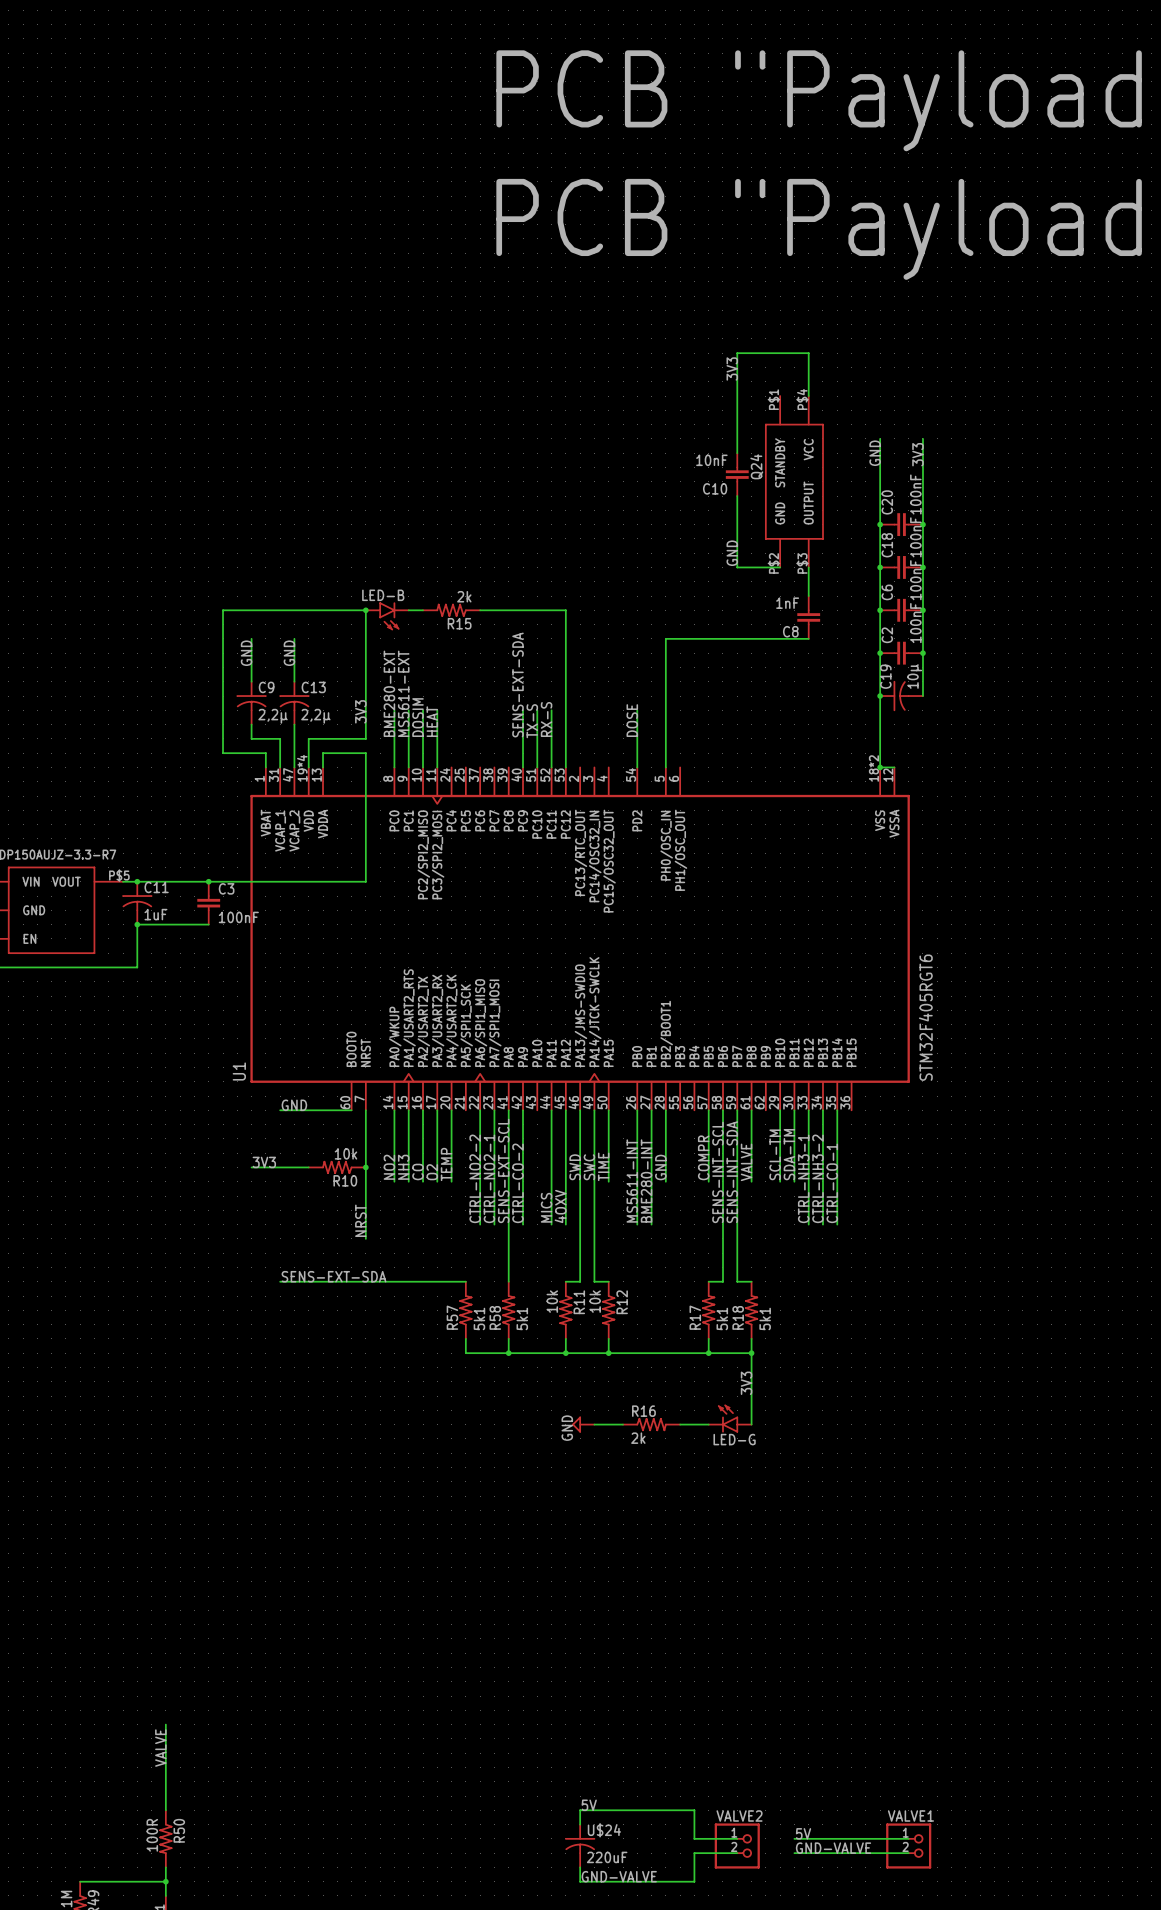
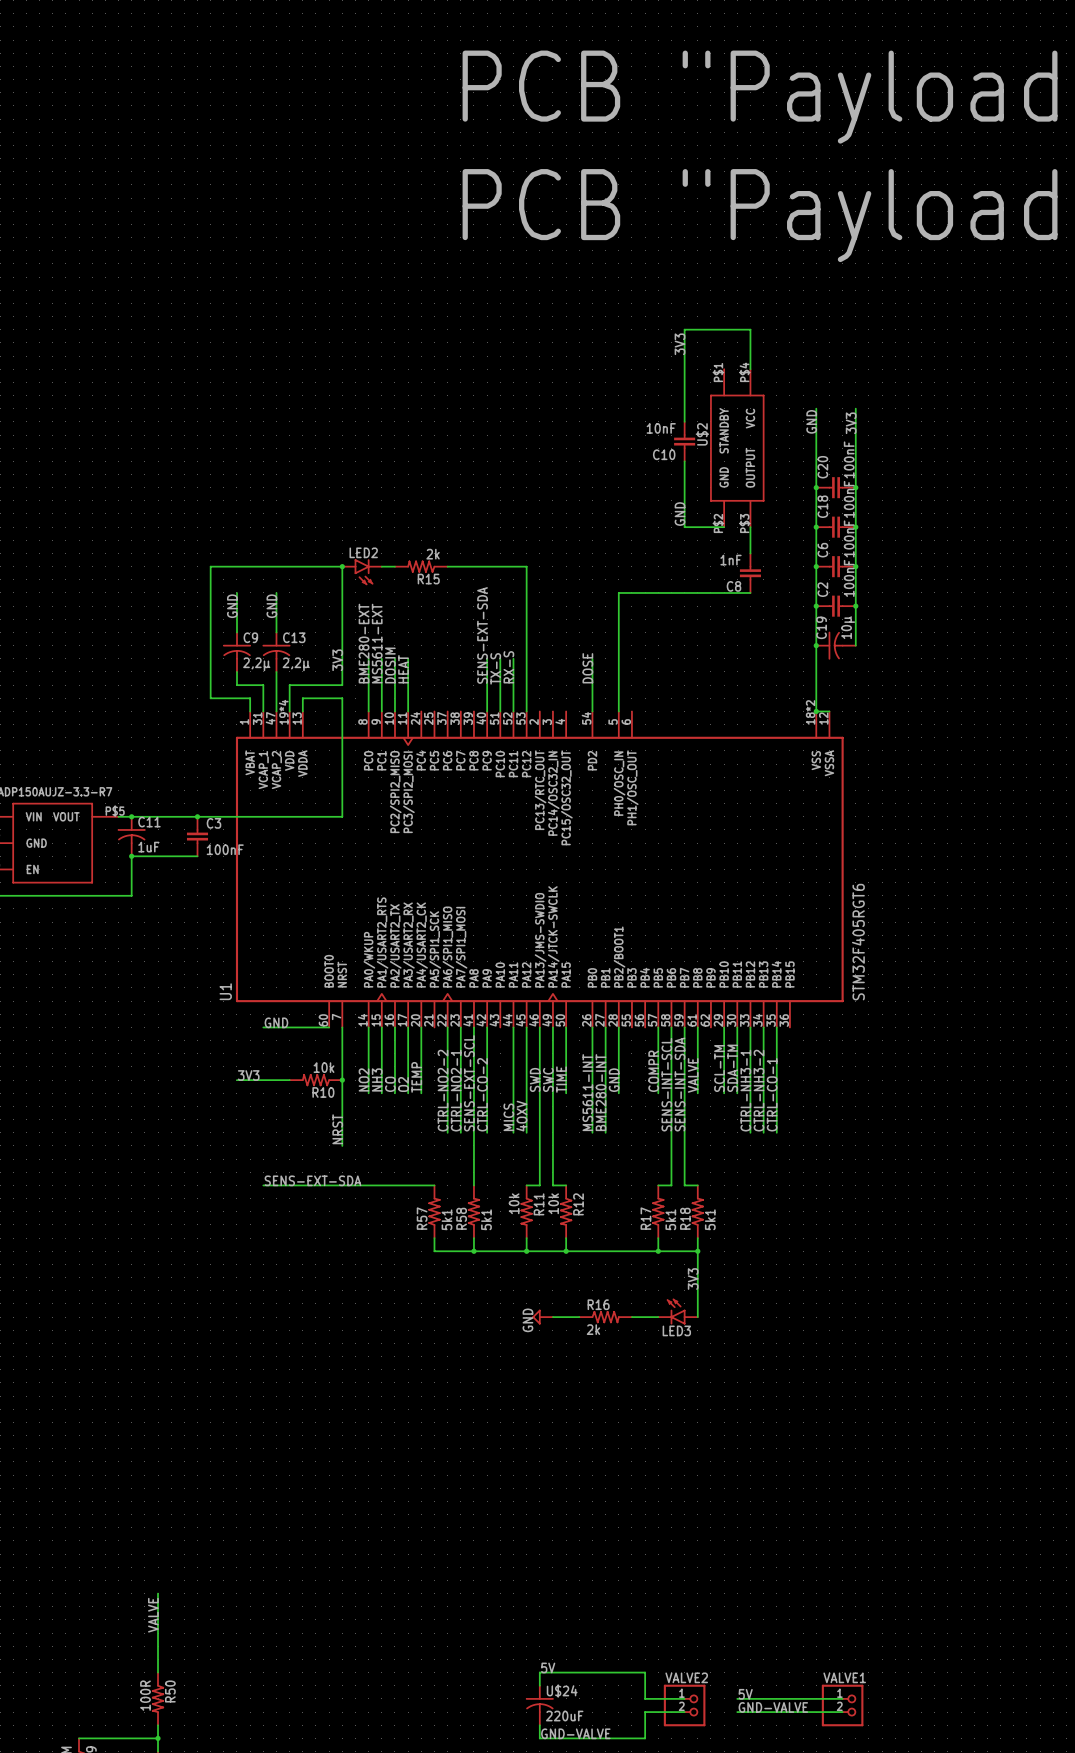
Q24 name: Q24 (756, 466) -> U$2 (702, 434)
LED-B name: LED-B (383, 595) -> LED2 (363, 552)
LED-G name: LED-G (734, 1439) -> LED3 (676, 1330)

